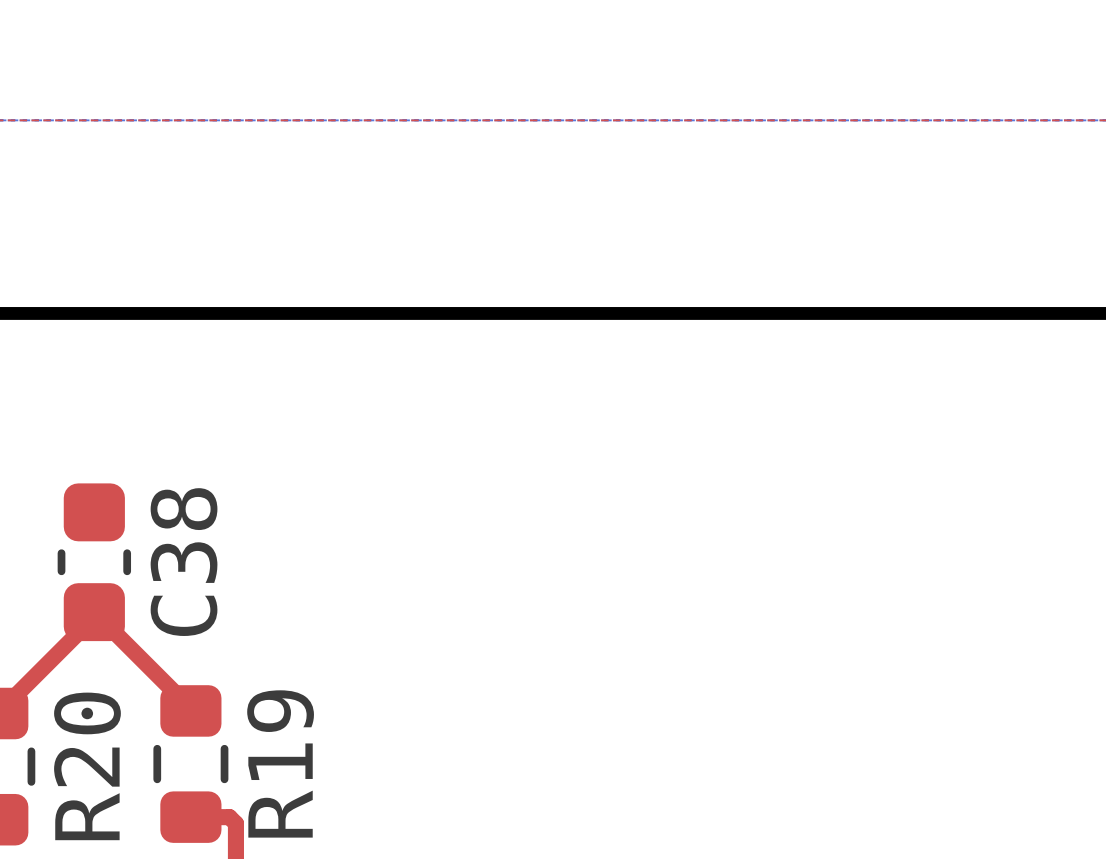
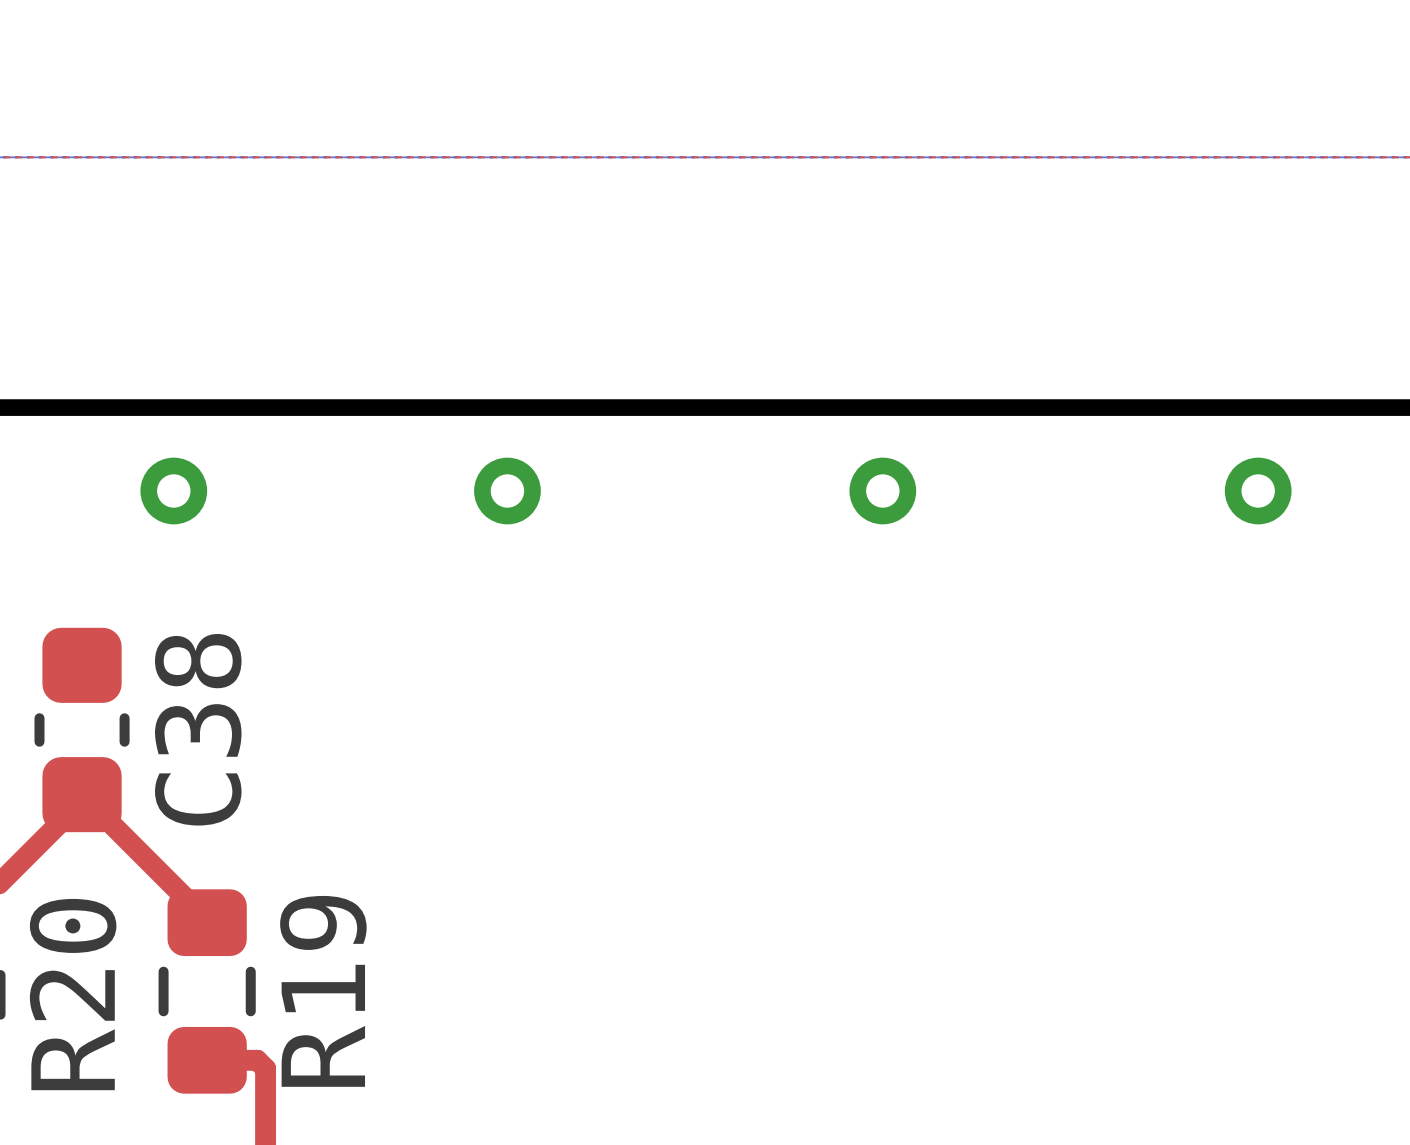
via: none -> (173, 491)
via: none -> (507, 491)
via: none -> (882, 491)
via: none -> (1258, 491)

